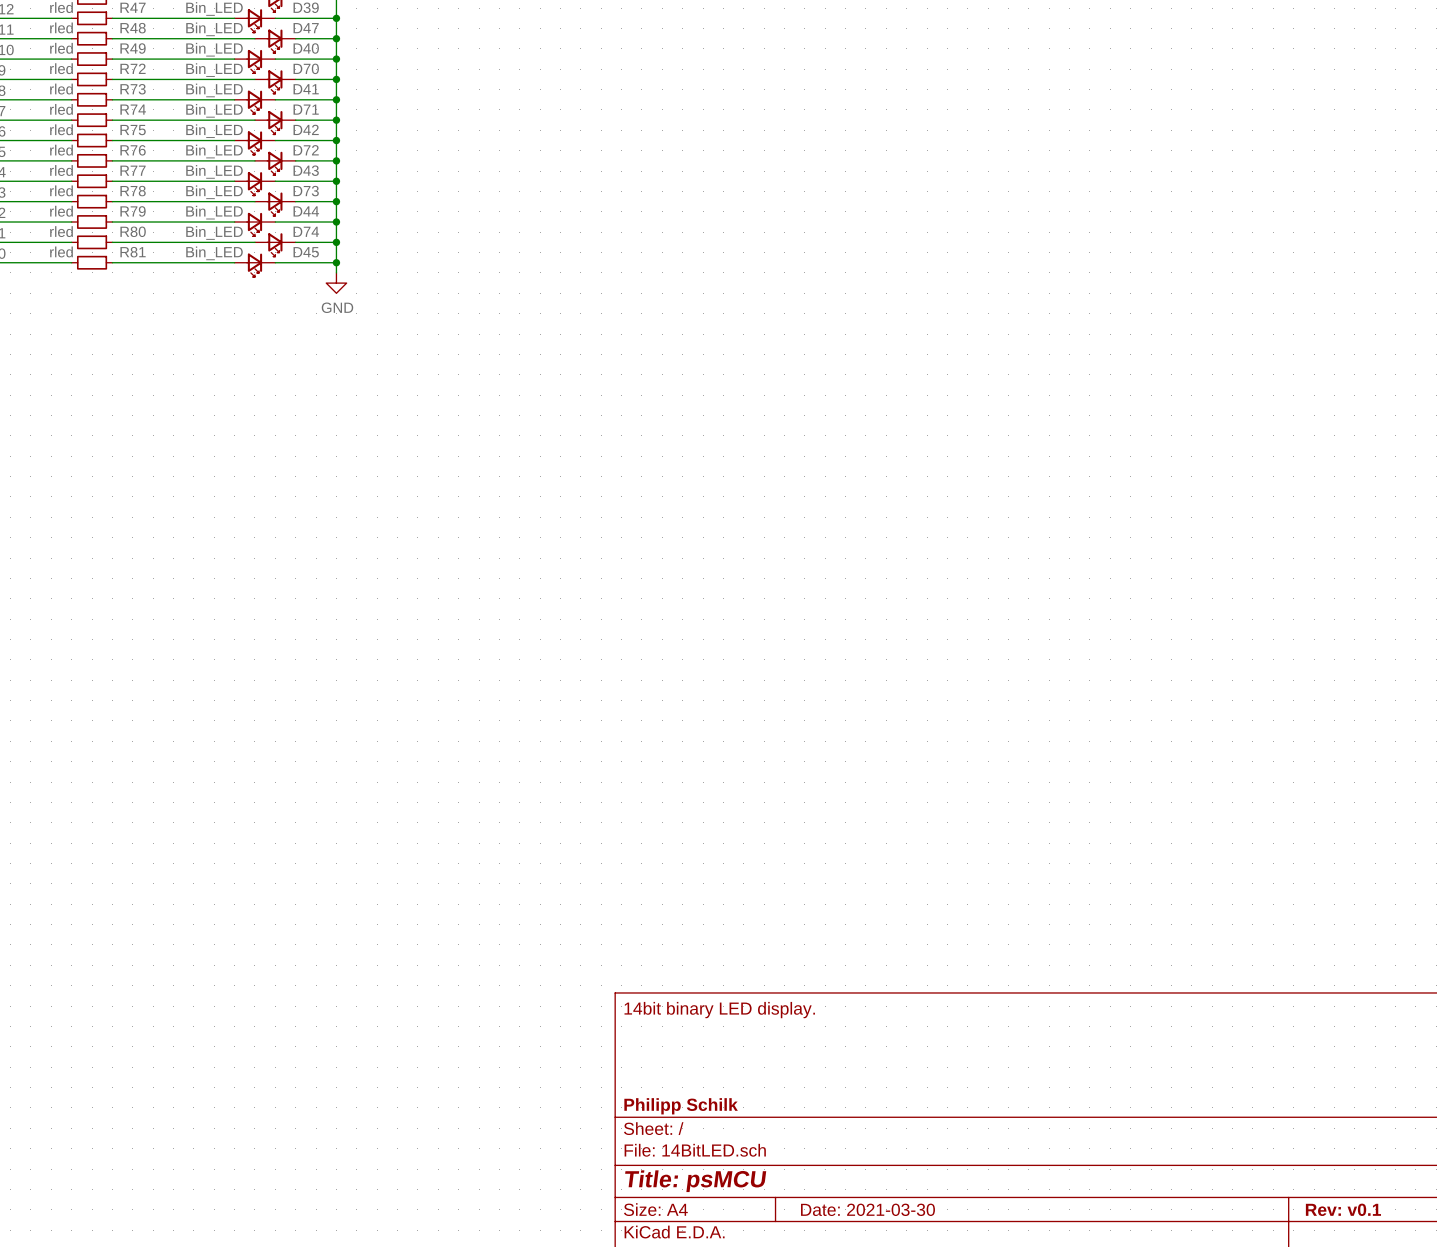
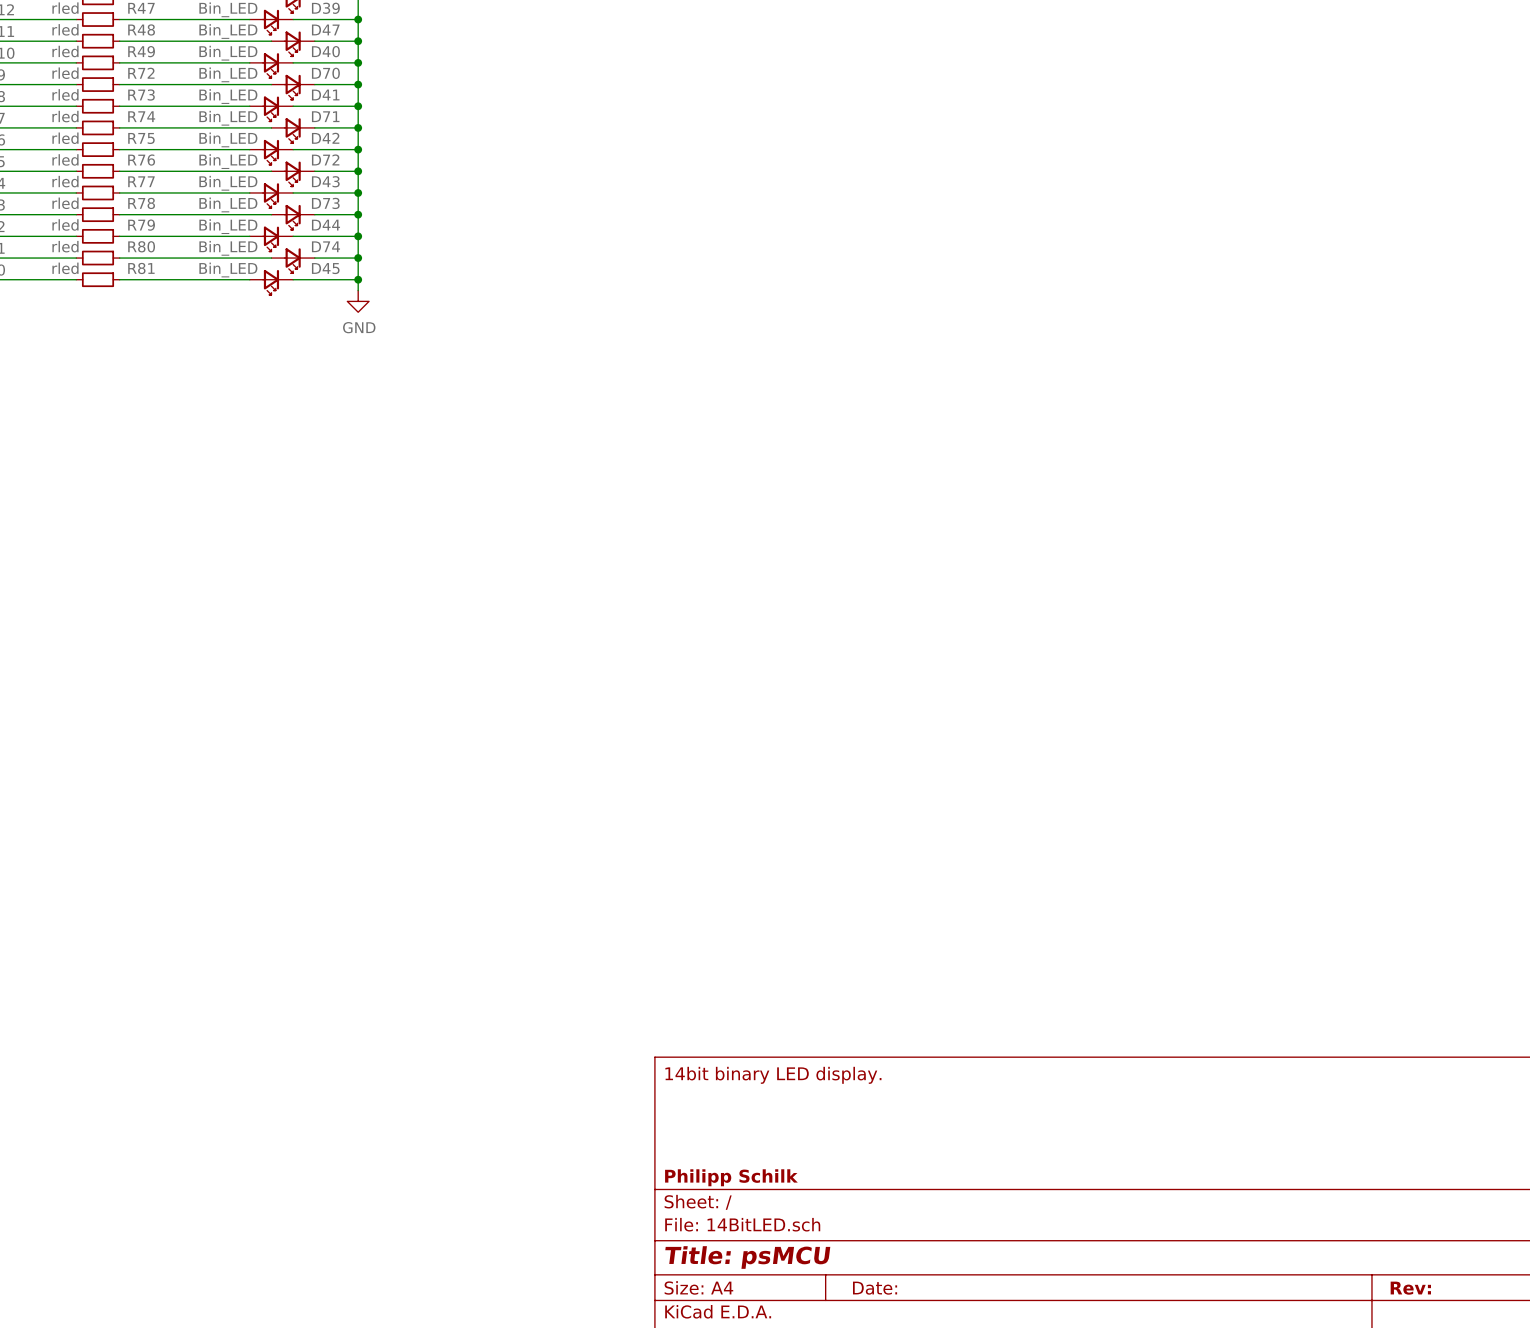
title block: Date: 2021-03-30 (867, 1209) -> Date: (875, 1288)
title block: Rev: v0.1 (1343, 1209) -> Rev: (1410, 1288)

